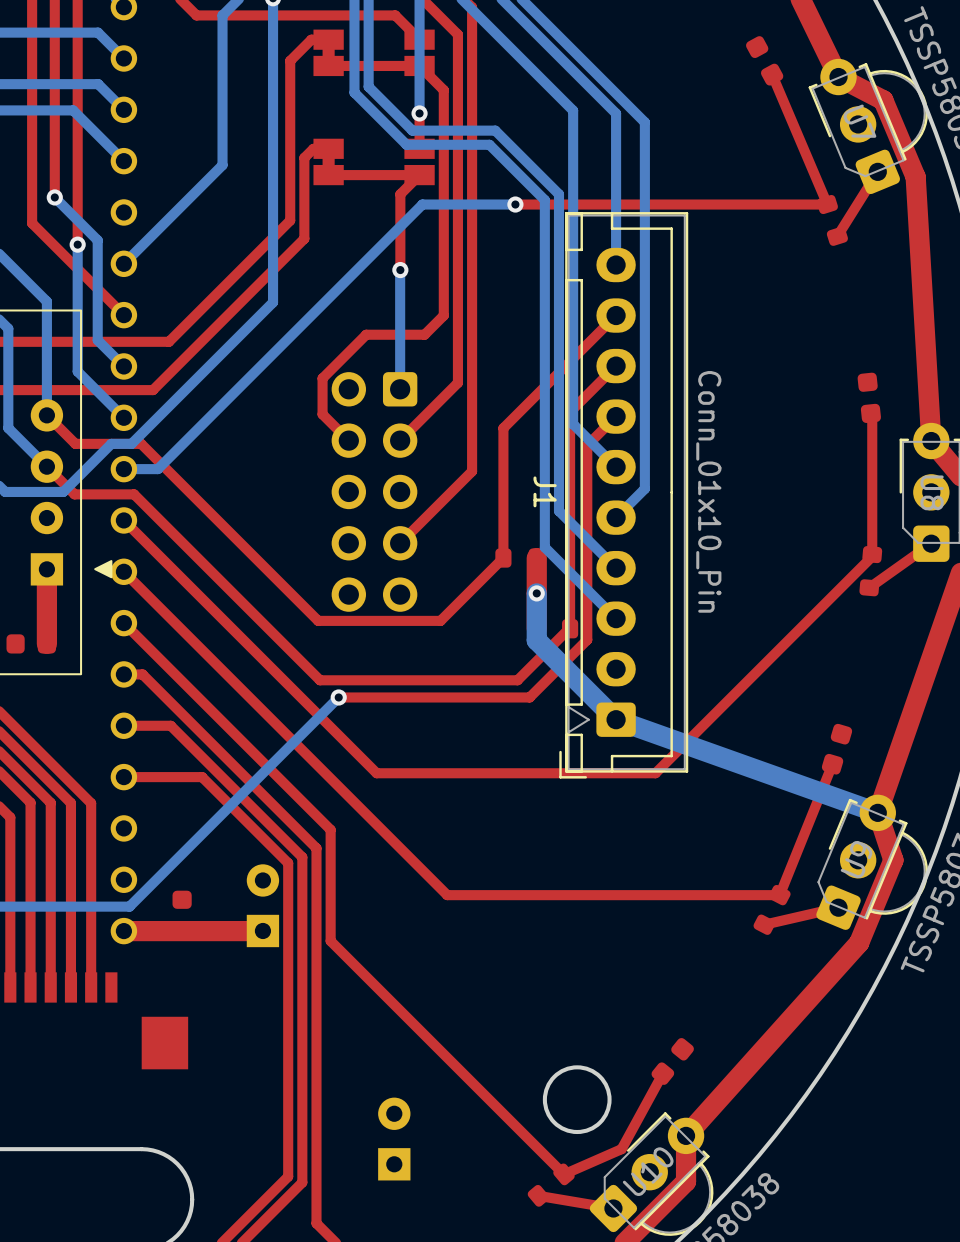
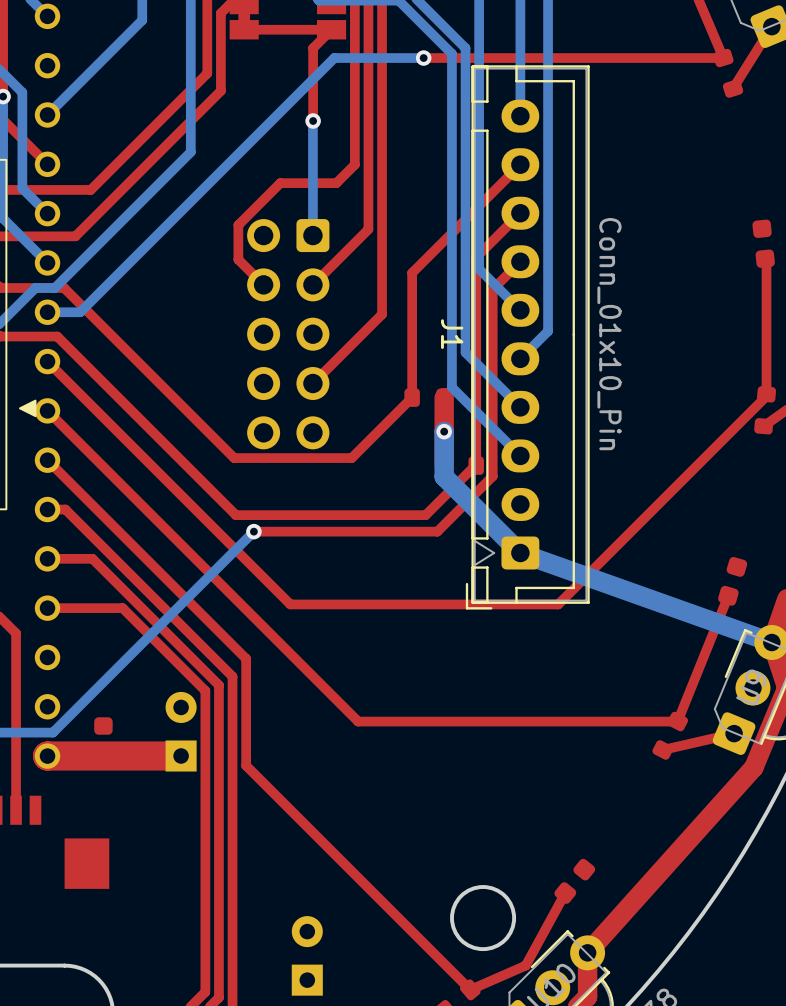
top track width: thin (262, 931) (123, 931) -> thick (181, 756) (47, 756)

